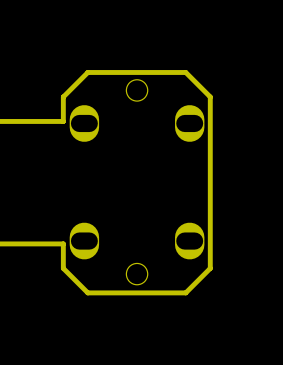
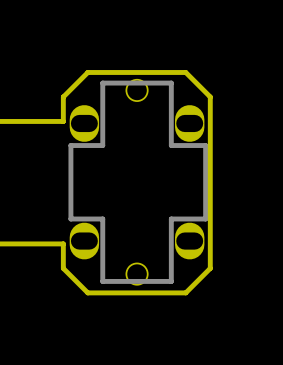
line: none -> (171, 83) (102, 83) (102, 145) (70, 145) (70, 218) (102, 218) (102, 281) (171, 281) (171, 218) (205, 218) (205, 145) (171, 145) (171, 83)

